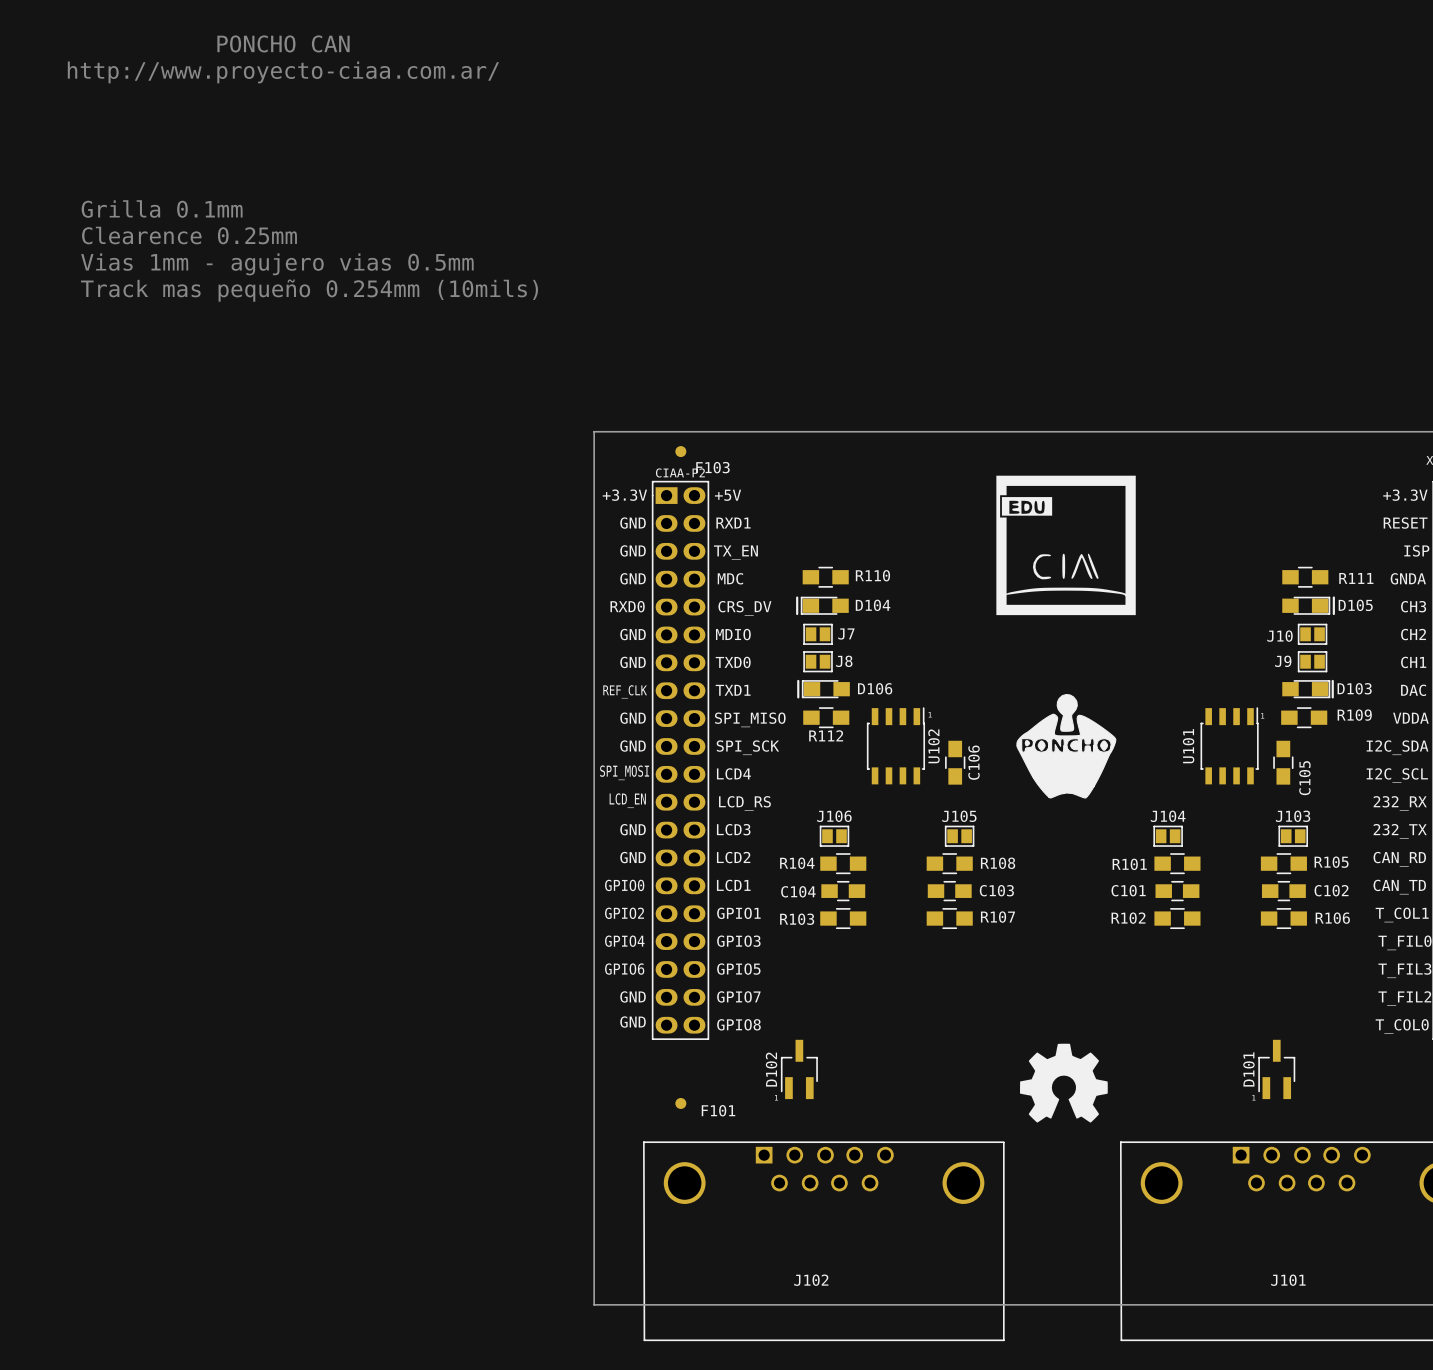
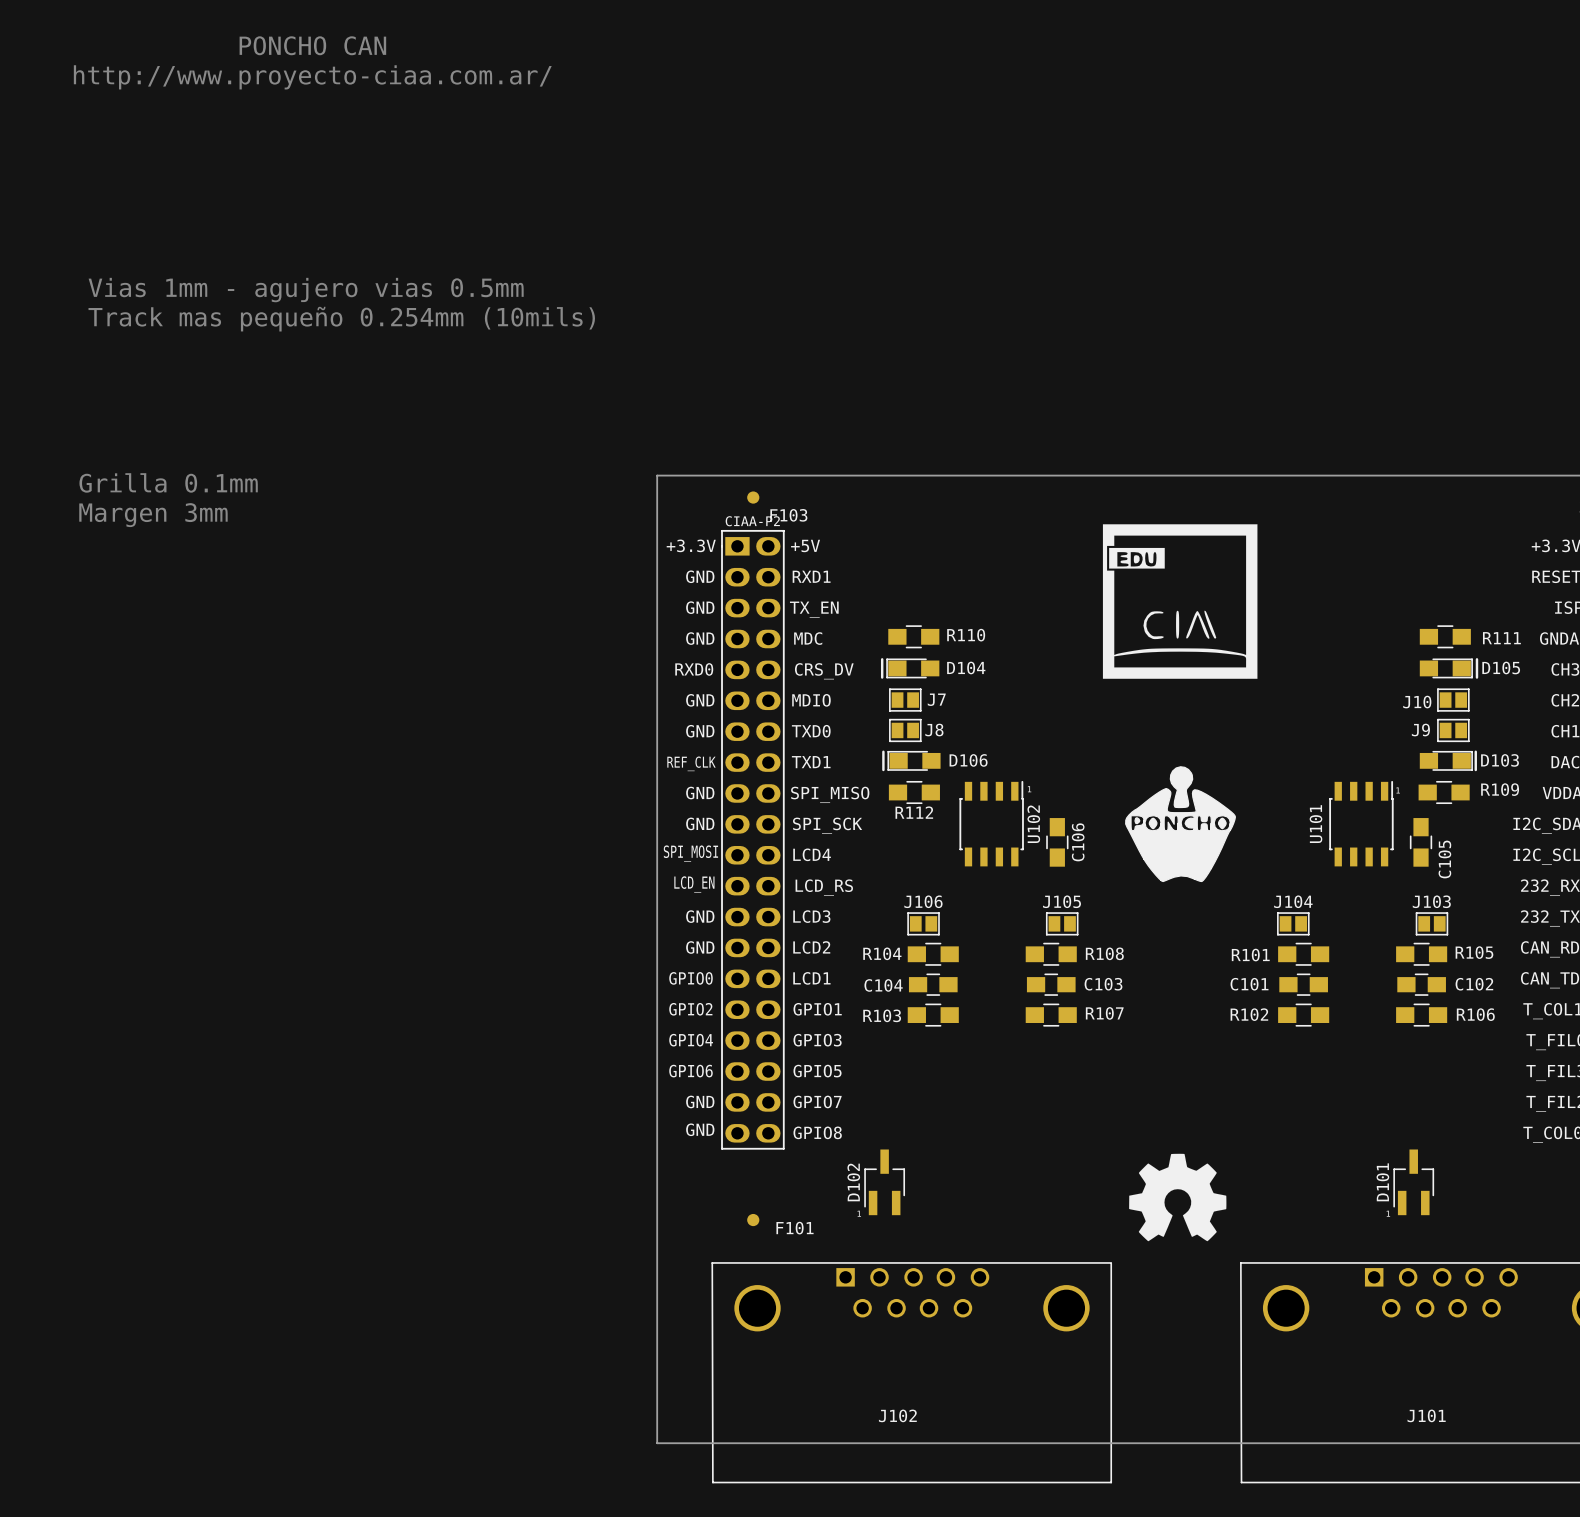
text position: Grilla 0.1mm (162, 209) -> Grilla 0.1mm (168, 482)
text: Clearence 0.25mm (189, 235) -> none
text: none -> Margen 3mm (153, 515)

